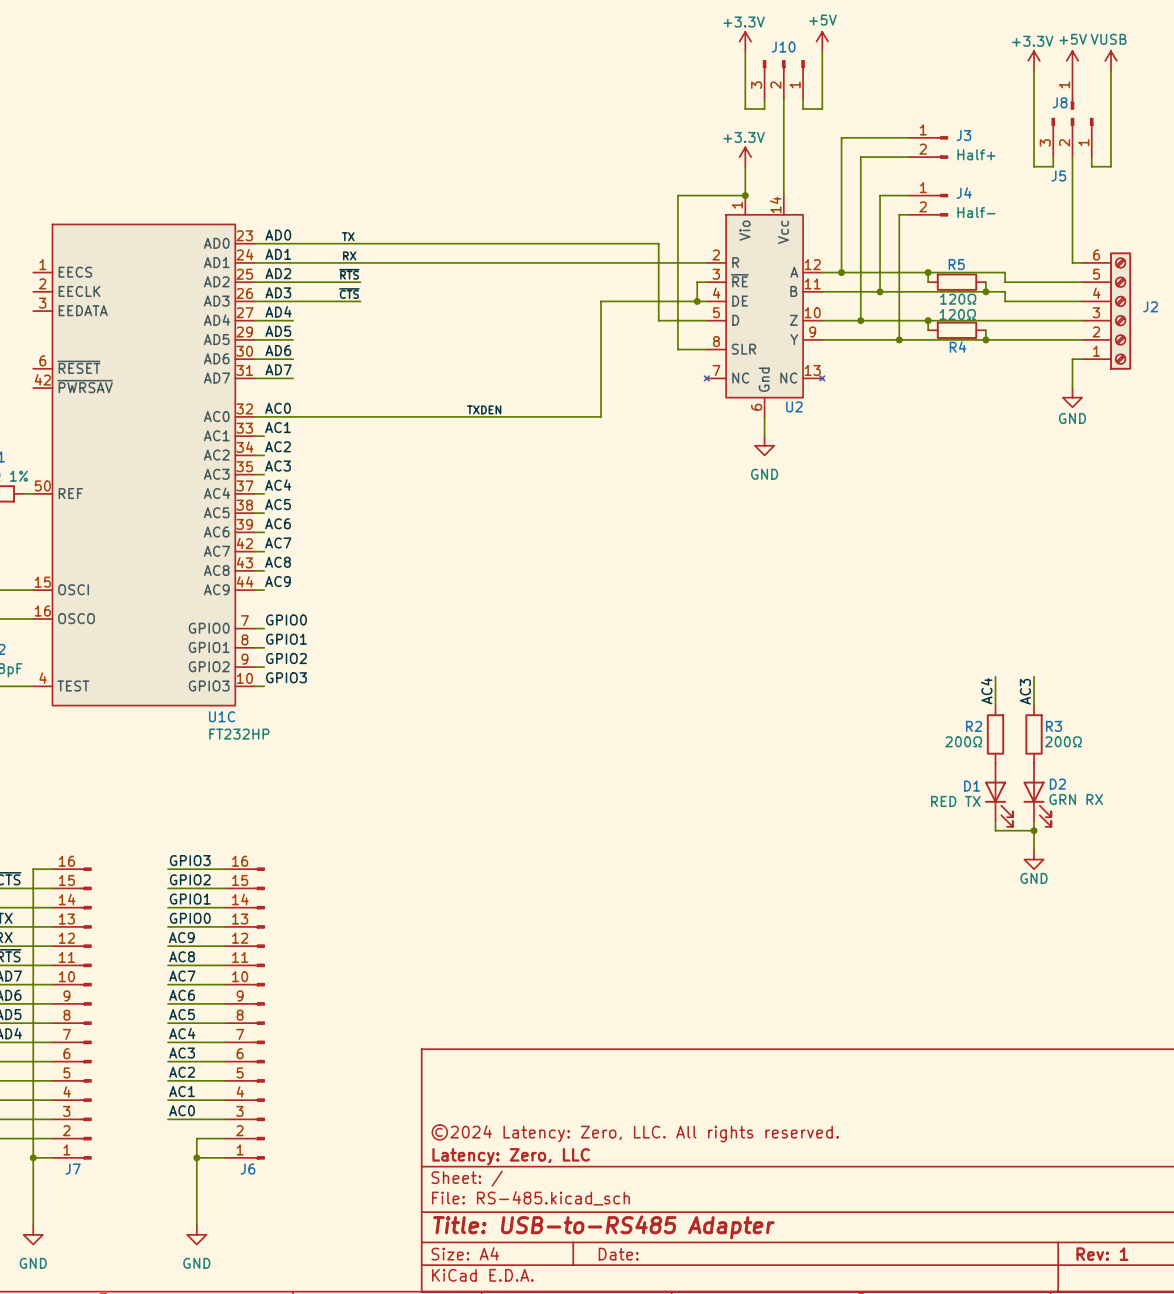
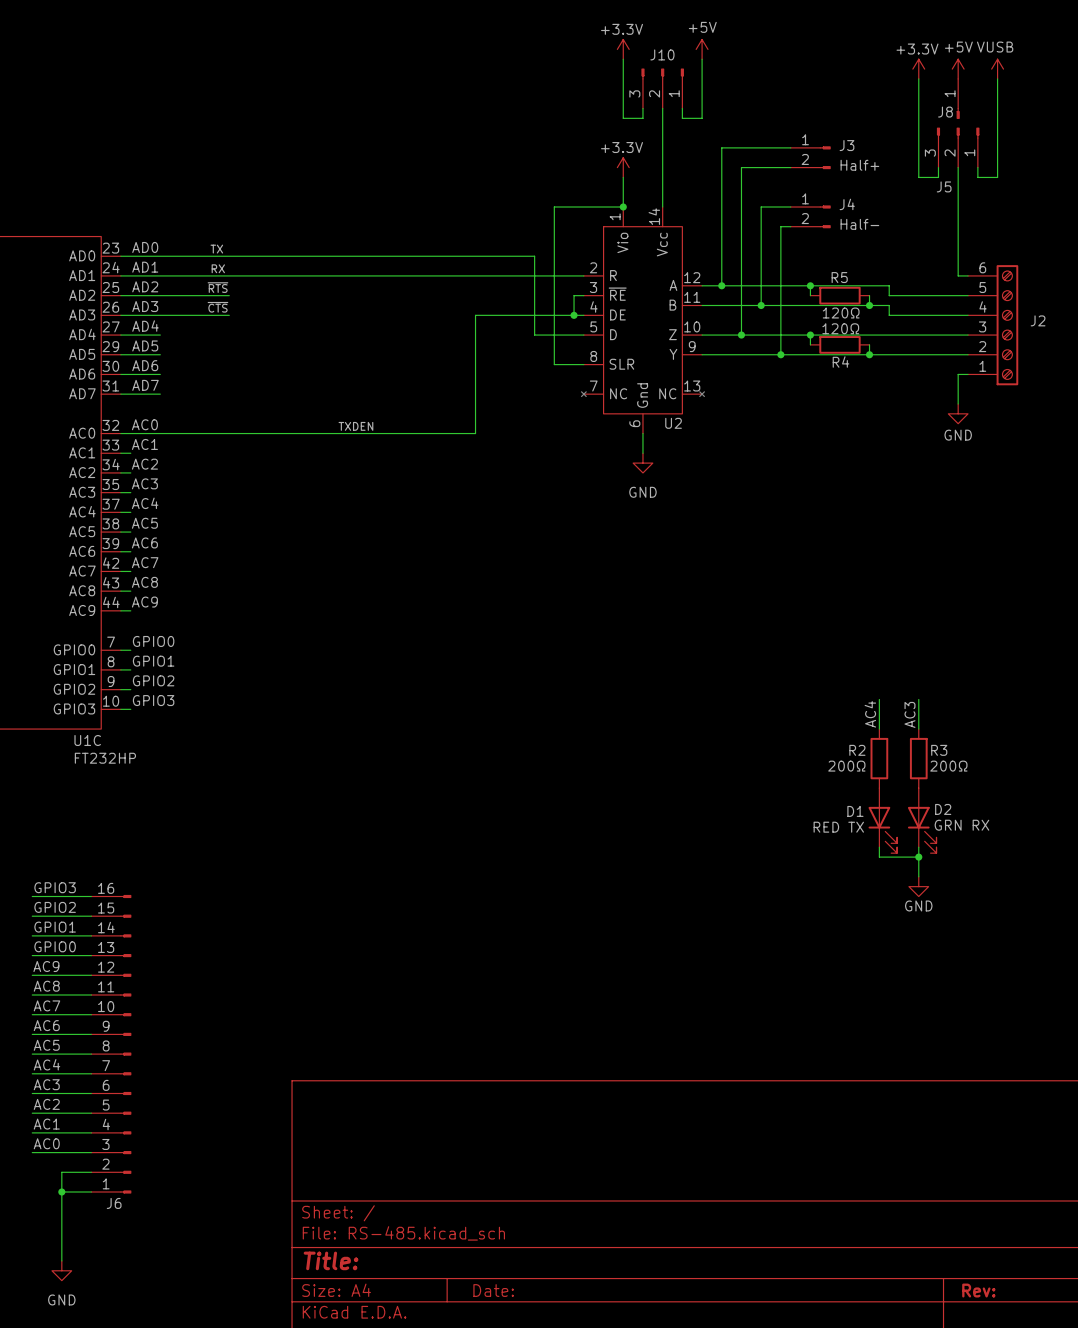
title block: ©2024 Latency: Zero, LLC. All rights reserved. (635, 1133) -> none
title block: Latency: Zero, LLC (511, 1156) -> none
title block: Title: USB-to-RS485 Adapter (603, 1227) -> Title: (331, 1260)
title block: Rev: 1 (1102, 1254) -> Rev: (978, 1290)

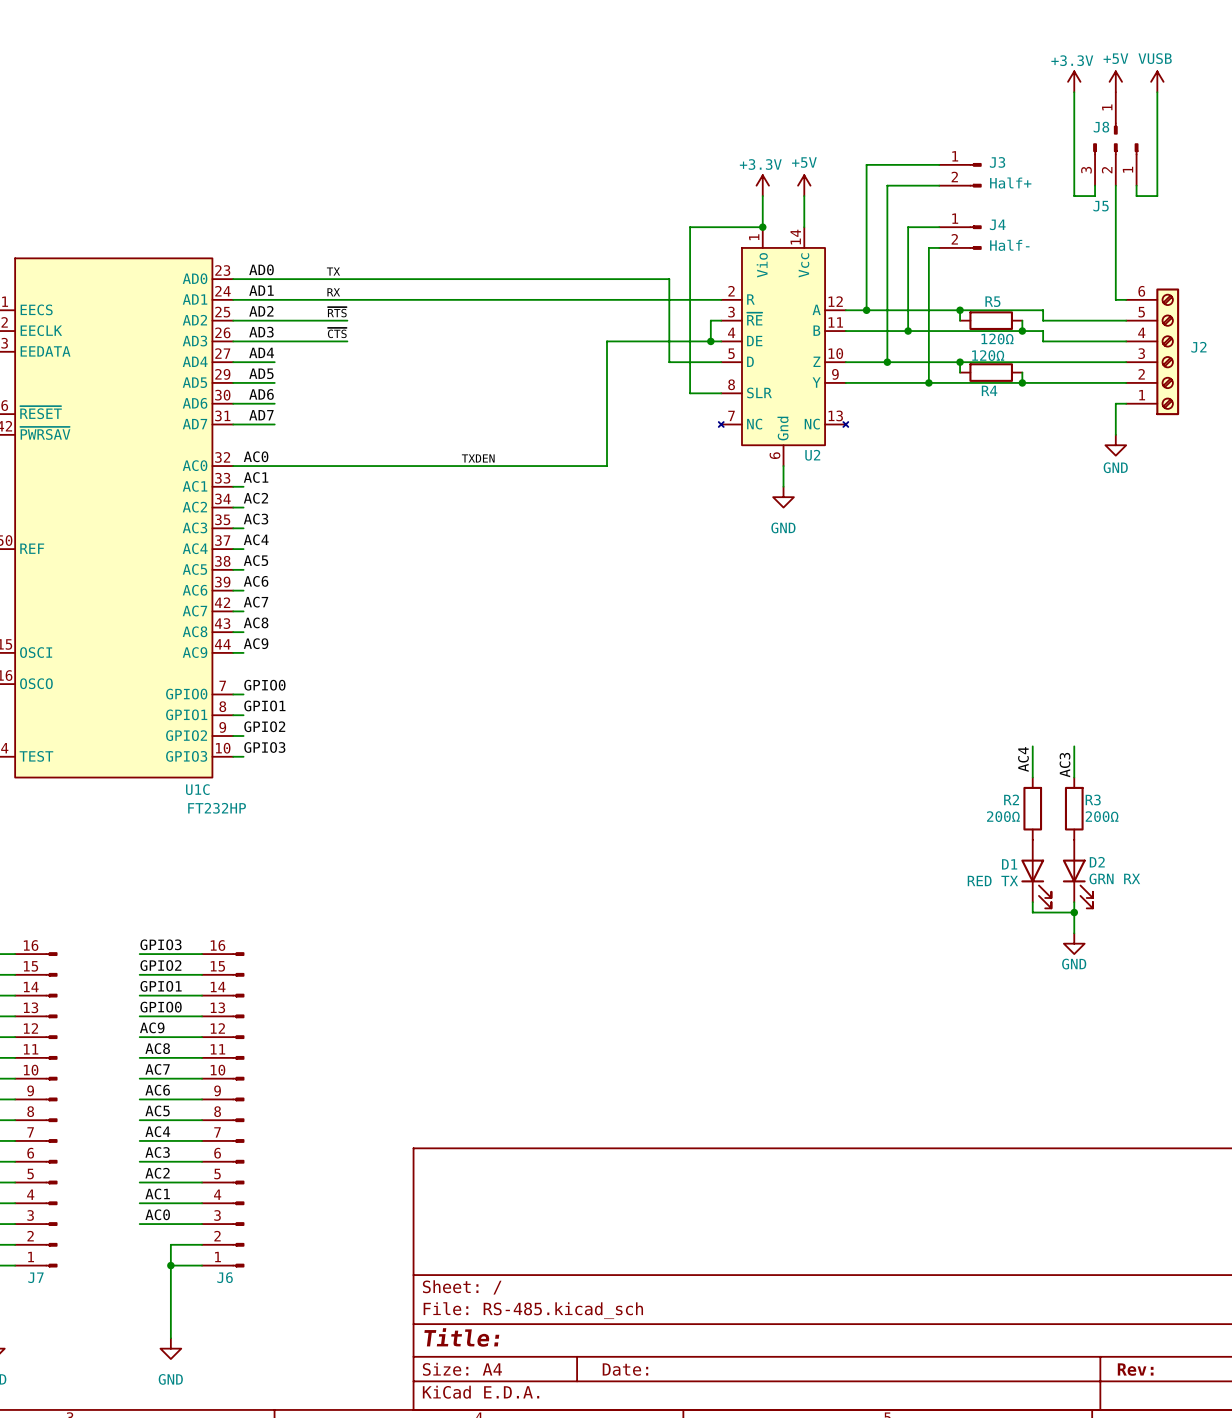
power symbol: +3.3V (623, 49) -> none
power symbol position: +5V (702, 49) -> +5V (804, 185)
wire: (623, 59) (623, 118) (642, 118) (642, 108) -> none
wire: (702, 59) (702, 118) (682, 118) (682, 108) -> none
J10: (662, 88) -> none
wire: (662, 108) (662, 177) -> none

